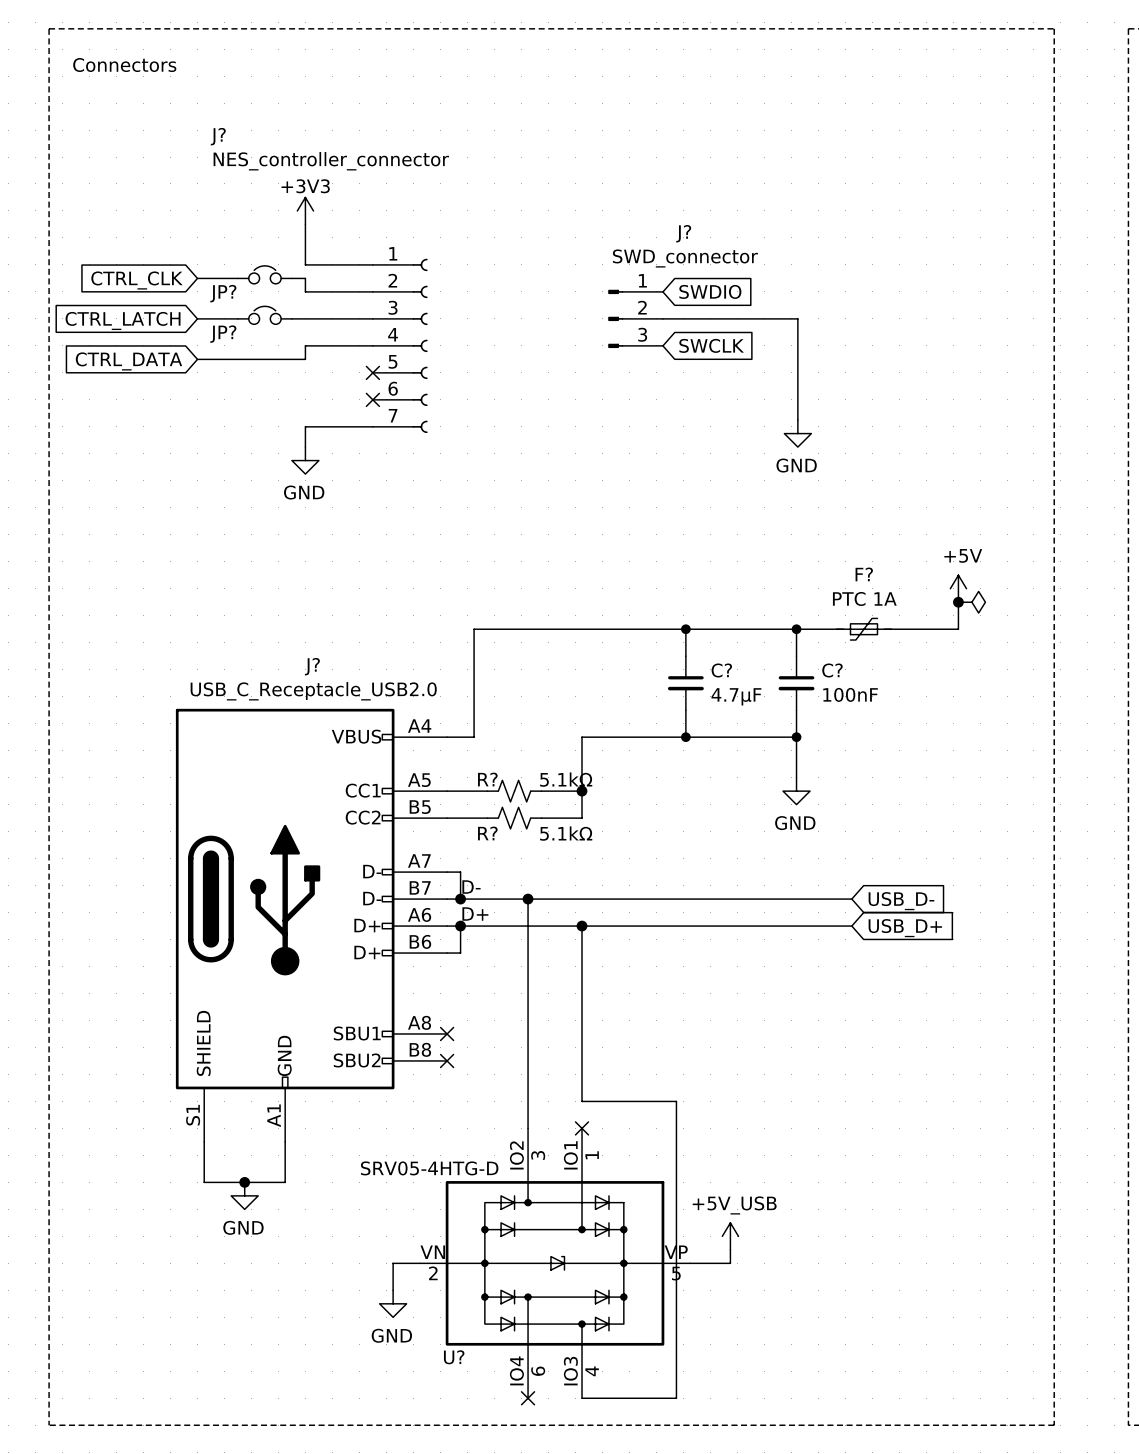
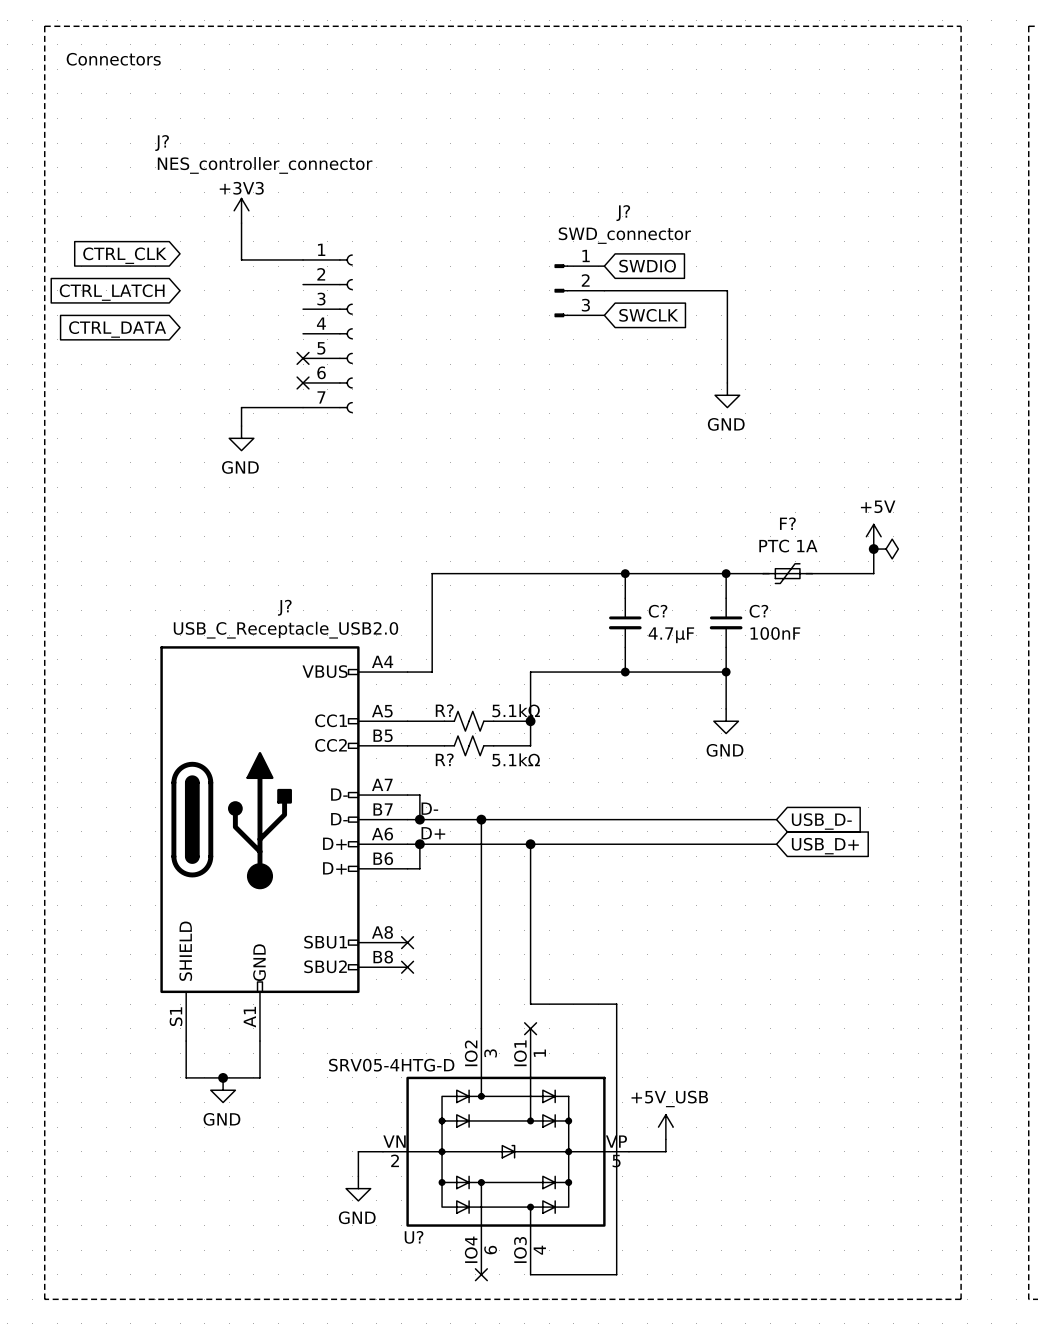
power symbol position: +3V3 (305, 210) -> +3V3 (241, 210)
wire: (305, 224) (305, 264) (372, 264) -> (241, 223) (241, 259) (303, 259)
JP?: (264, 274) -> none
wire: (197, 278) (237, 278) -> none
wire: (291, 278) (305, 278) (305, 291) (372, 291) -> none
JP?: (264, 315) -> none
wire: (197, 318) (237, 318) -> none
wire: (291, 318) (372, 318) -> none
wire: (372, 345) (305, 345) (305, 359) (197, 359) -> none
J? position: (400, 345) -> (328, 333)
no-connect mark: (372, 372) -> none
no-connect mark: none -> (303, 358)
no-connect mark: (372, 399) -> none
no-connect mark: none -> (303, 382)
wire: (372, 426) (305, 426) (305, 447) -> (303, 407) (241, 407) (241, 426)
power symbol position: GND (305, 460) -> GND (241, 438)

